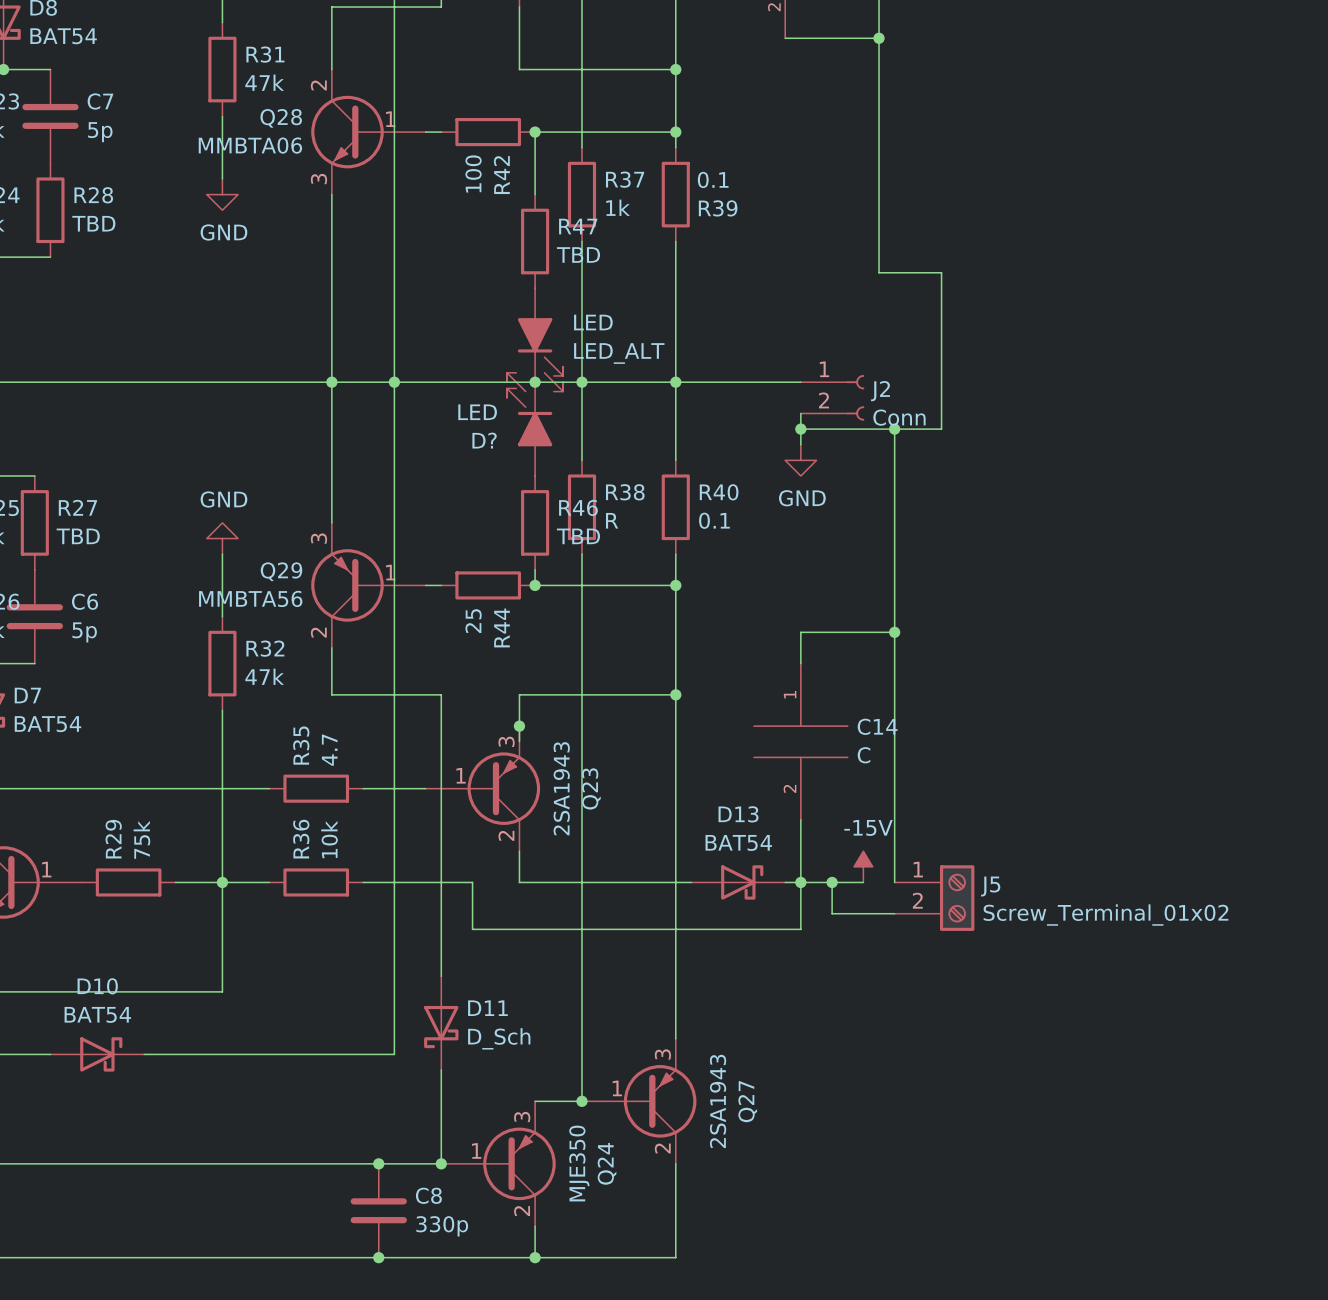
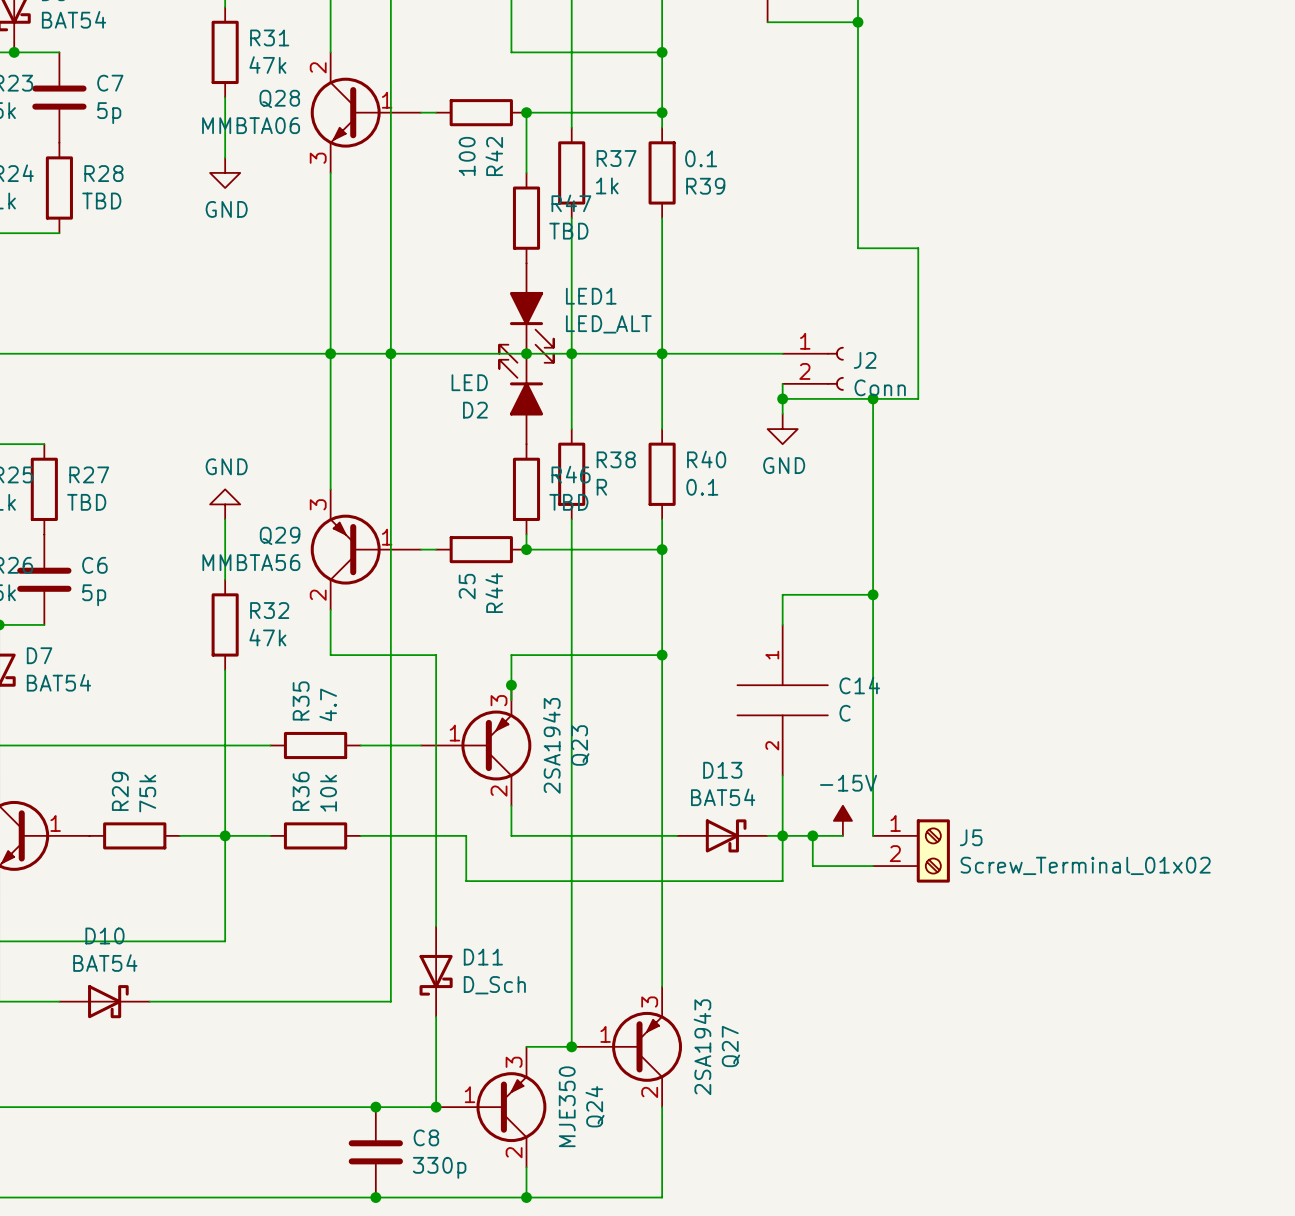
LED name: LED (593, 322) -> LED1 (591, 296)
D? name: D? (484, 440) -> D2 (475, 410)

